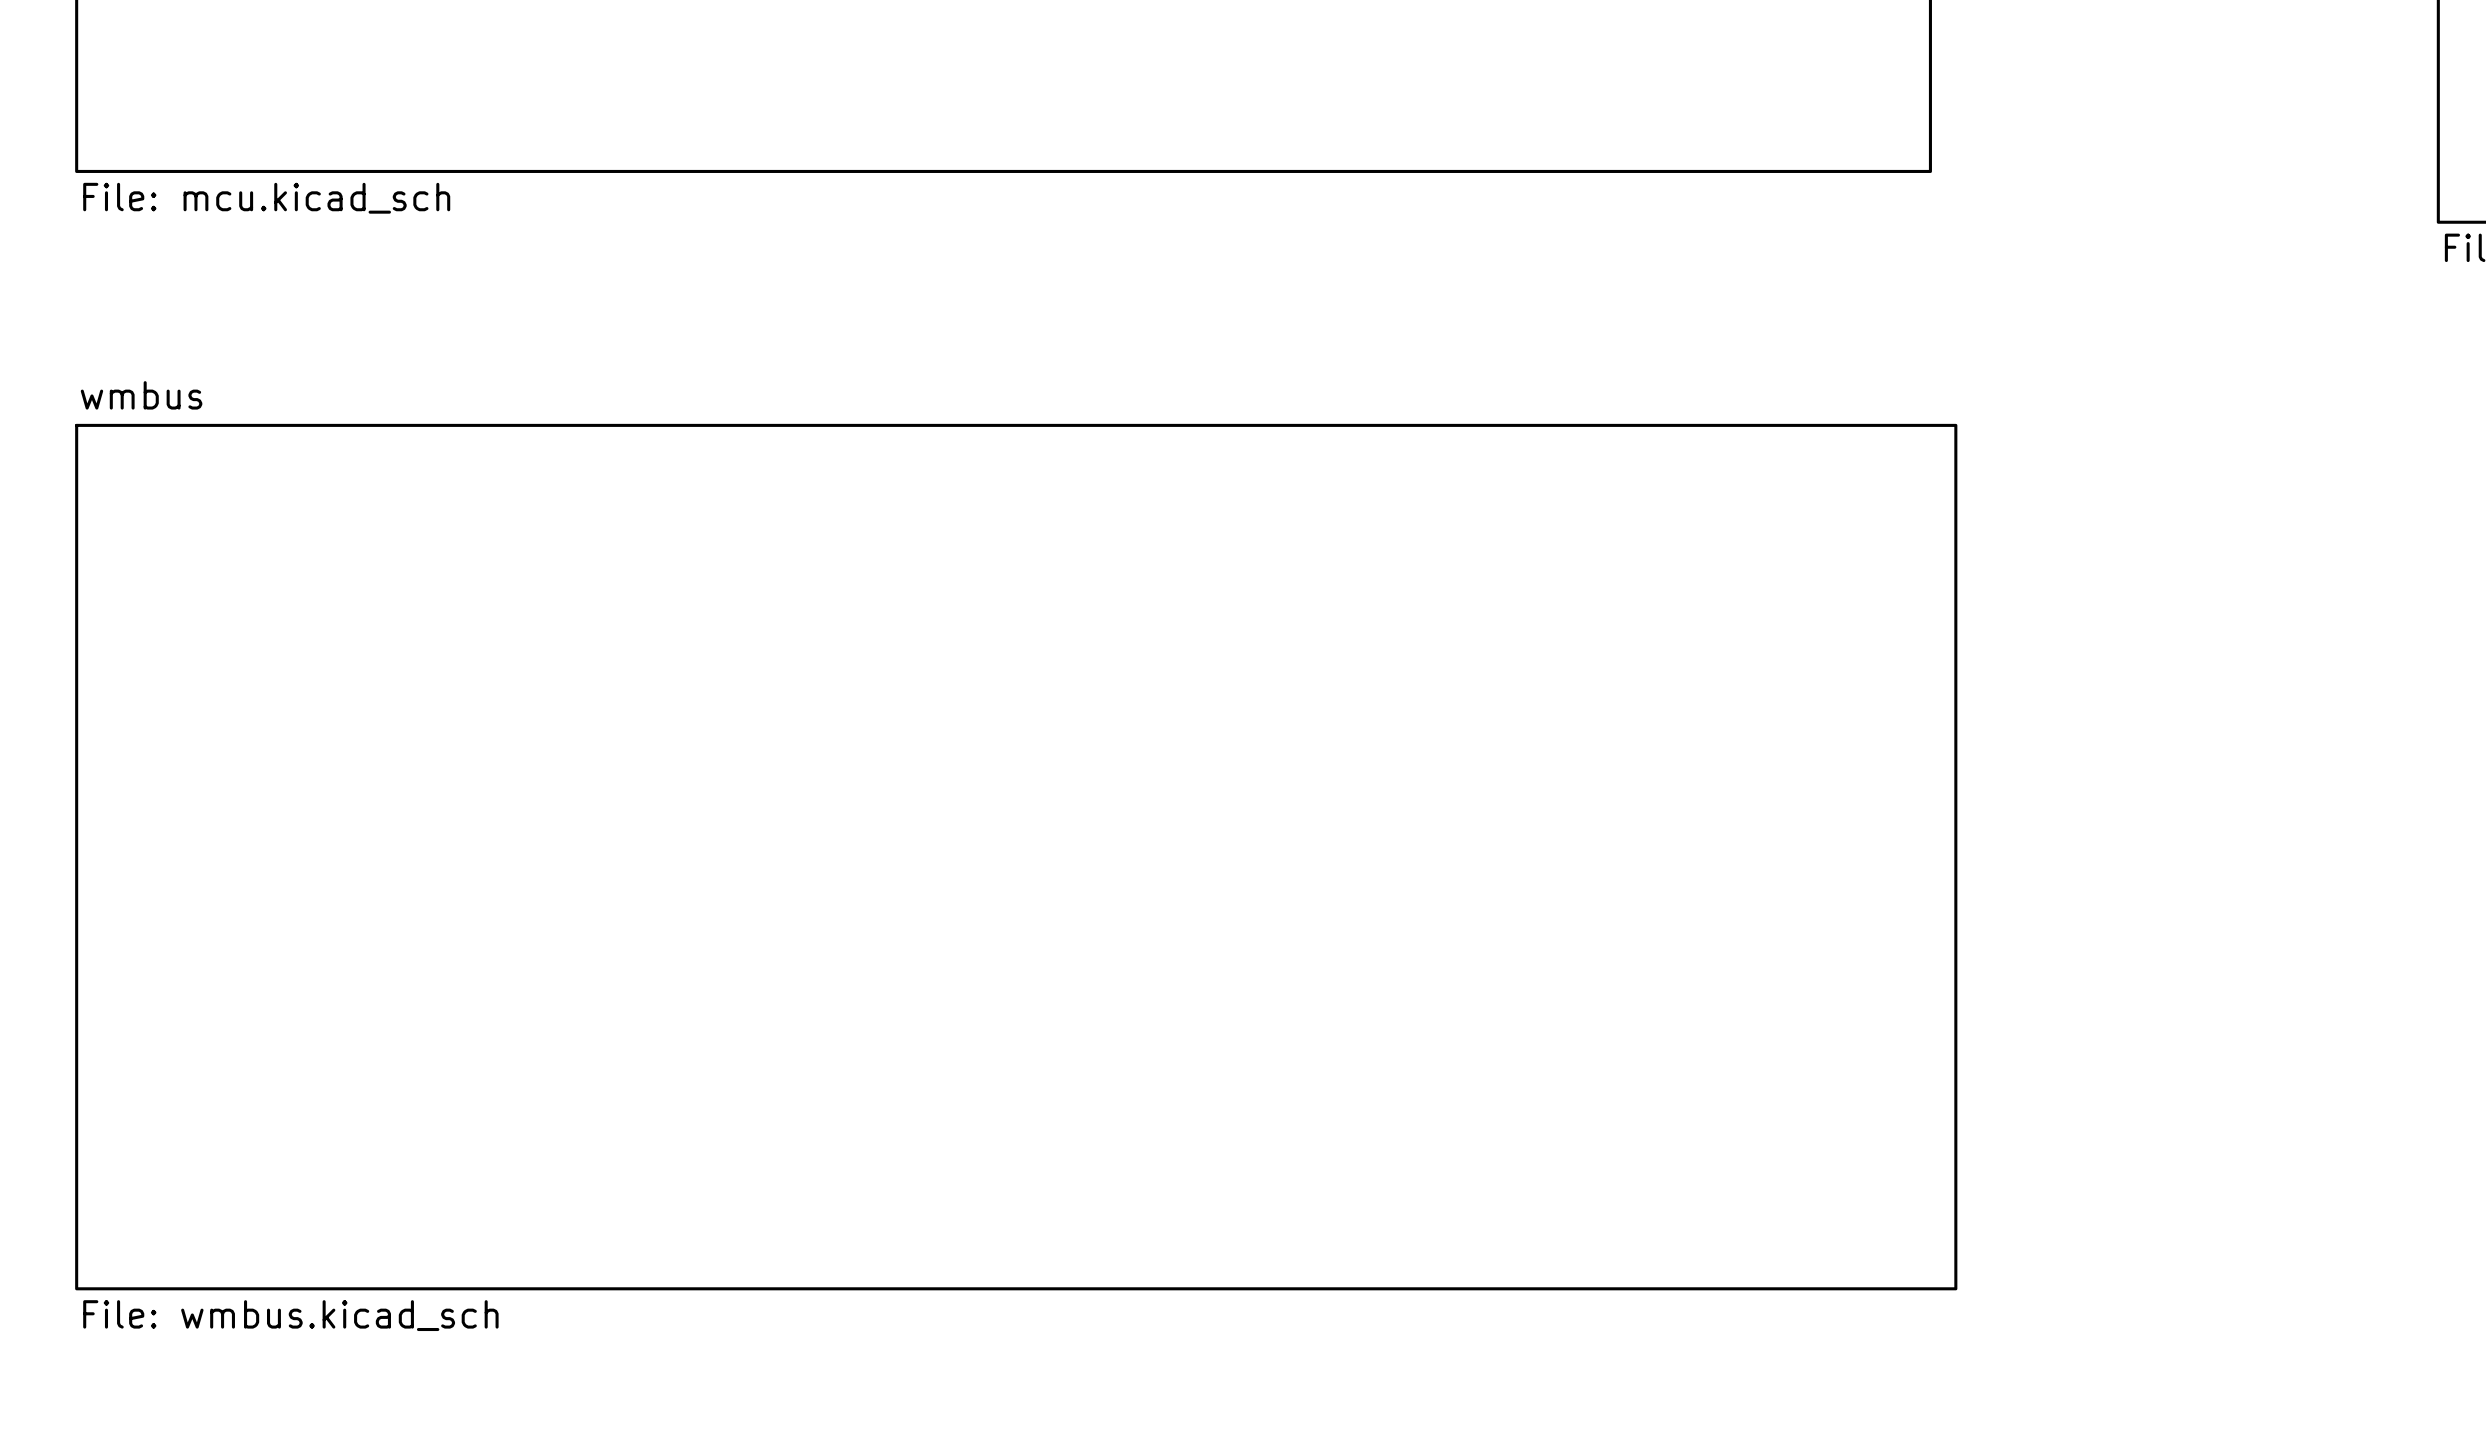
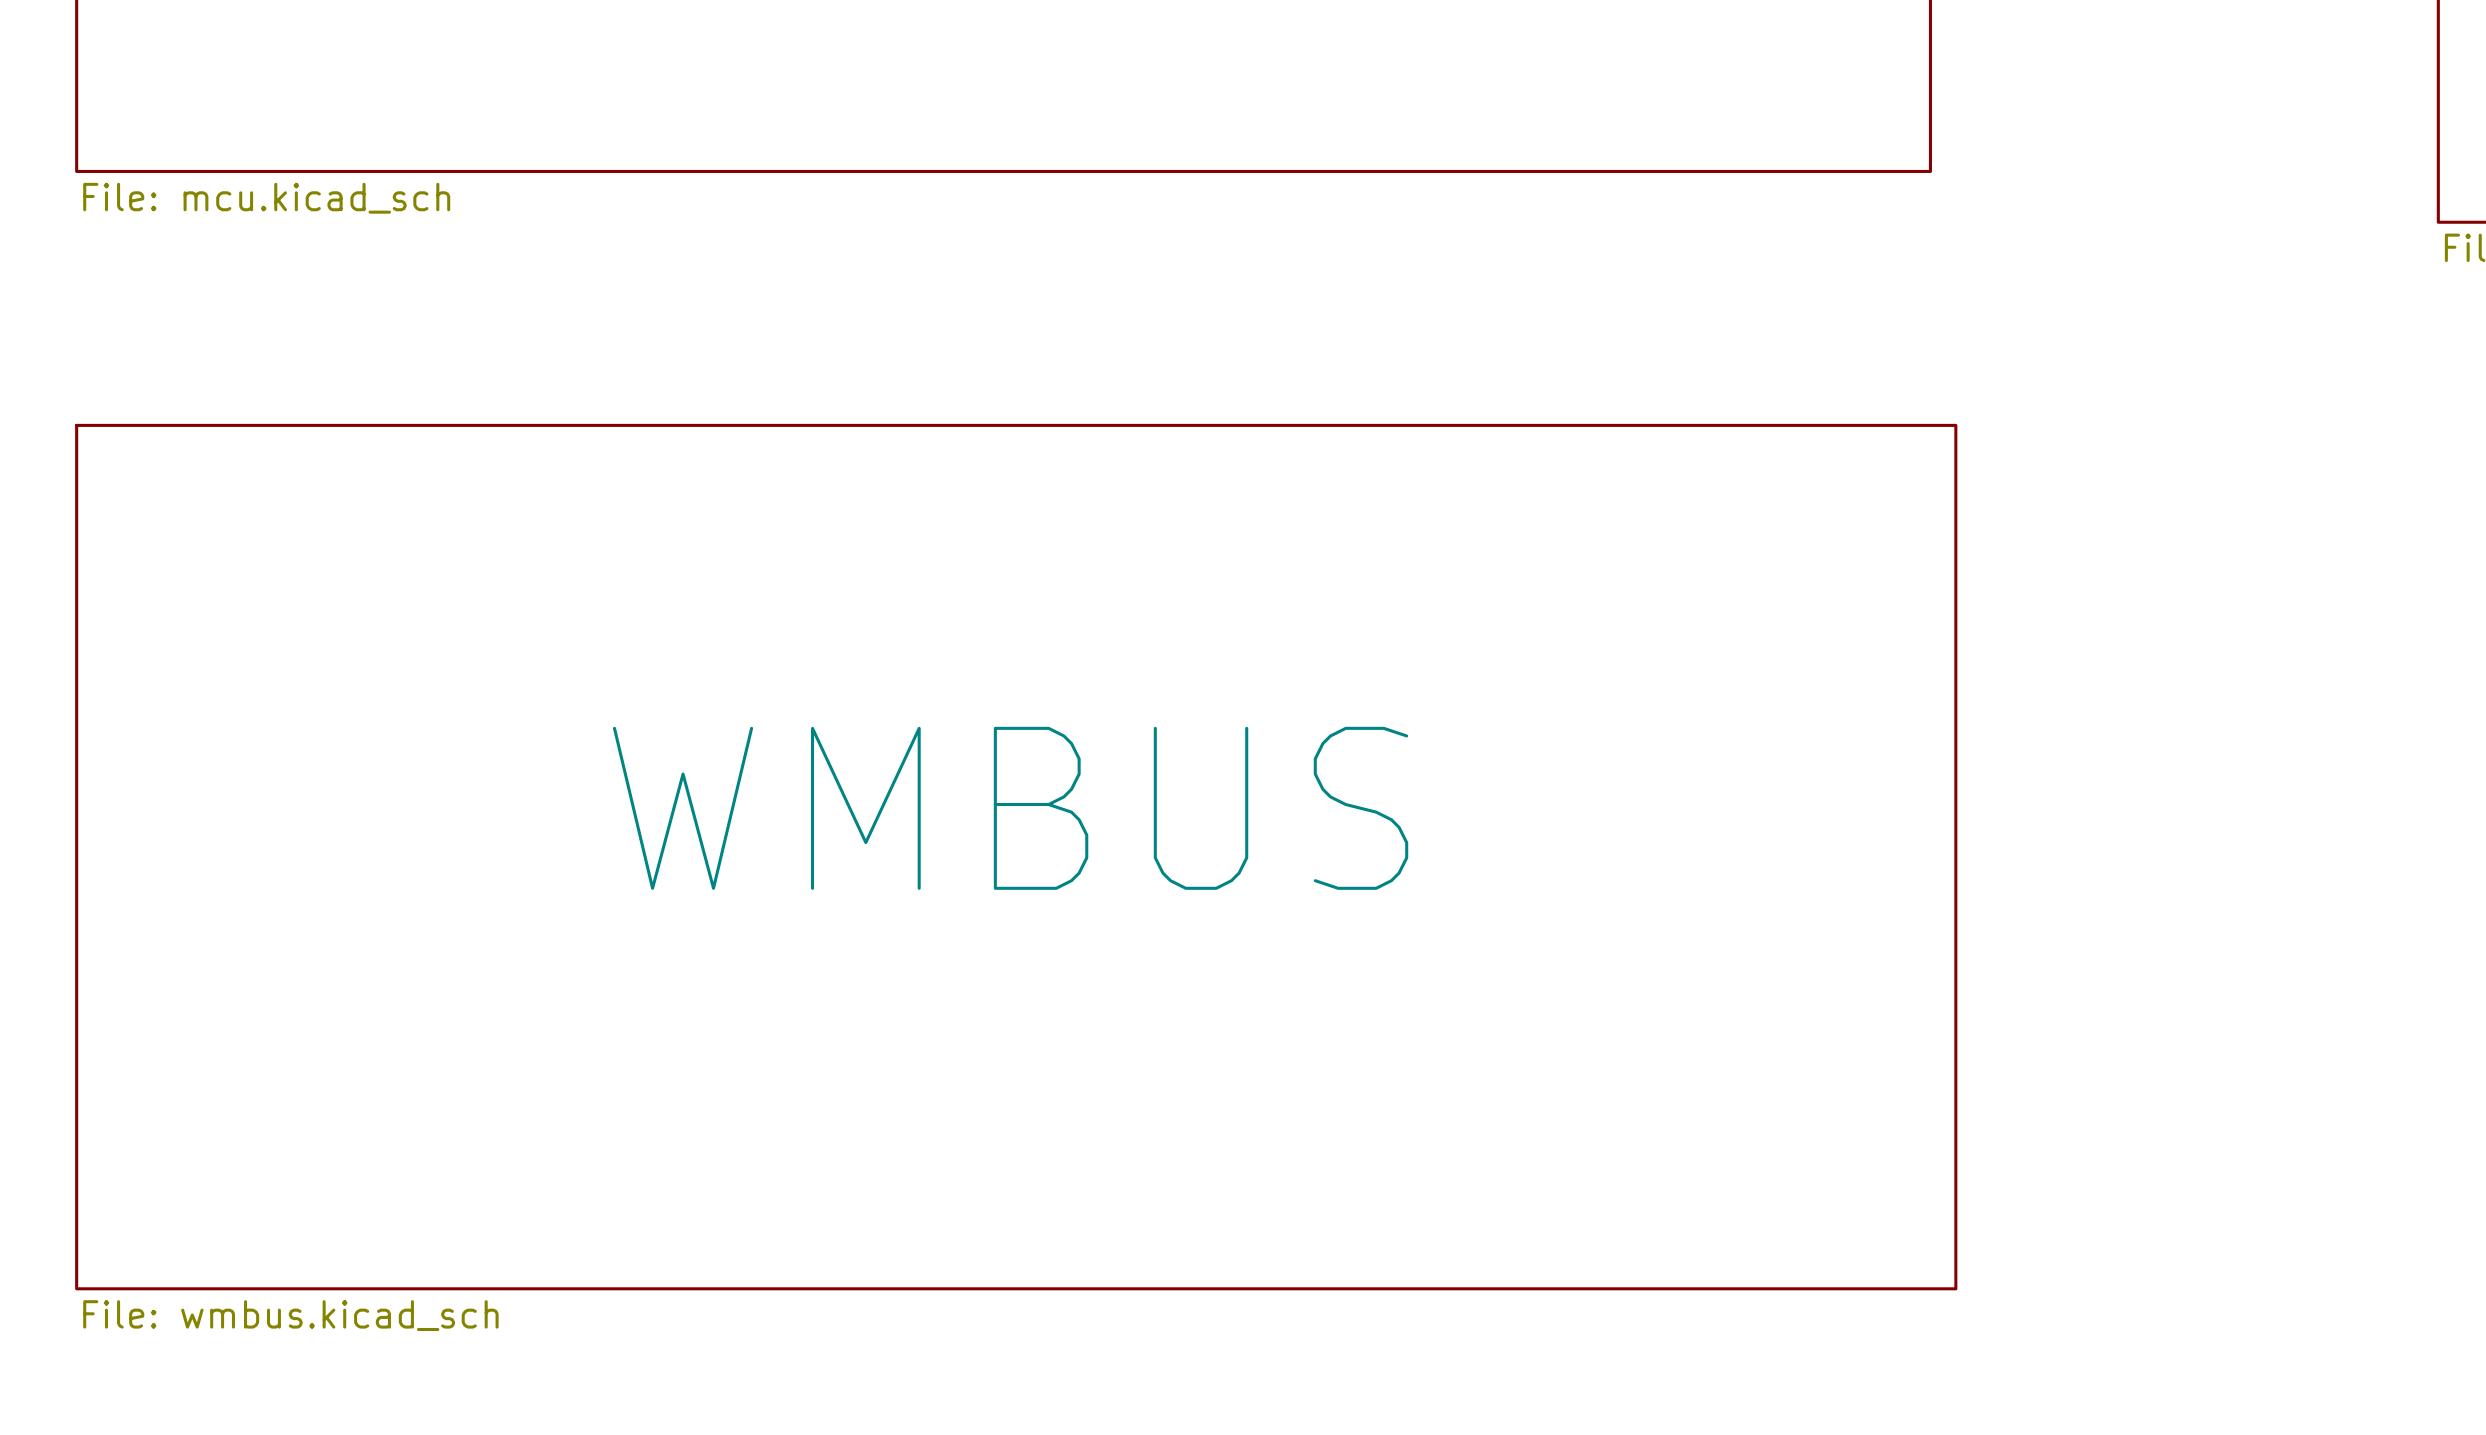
sheet wmbus name: wmbus (141, 395) -> WMBUS (1010, 808)

